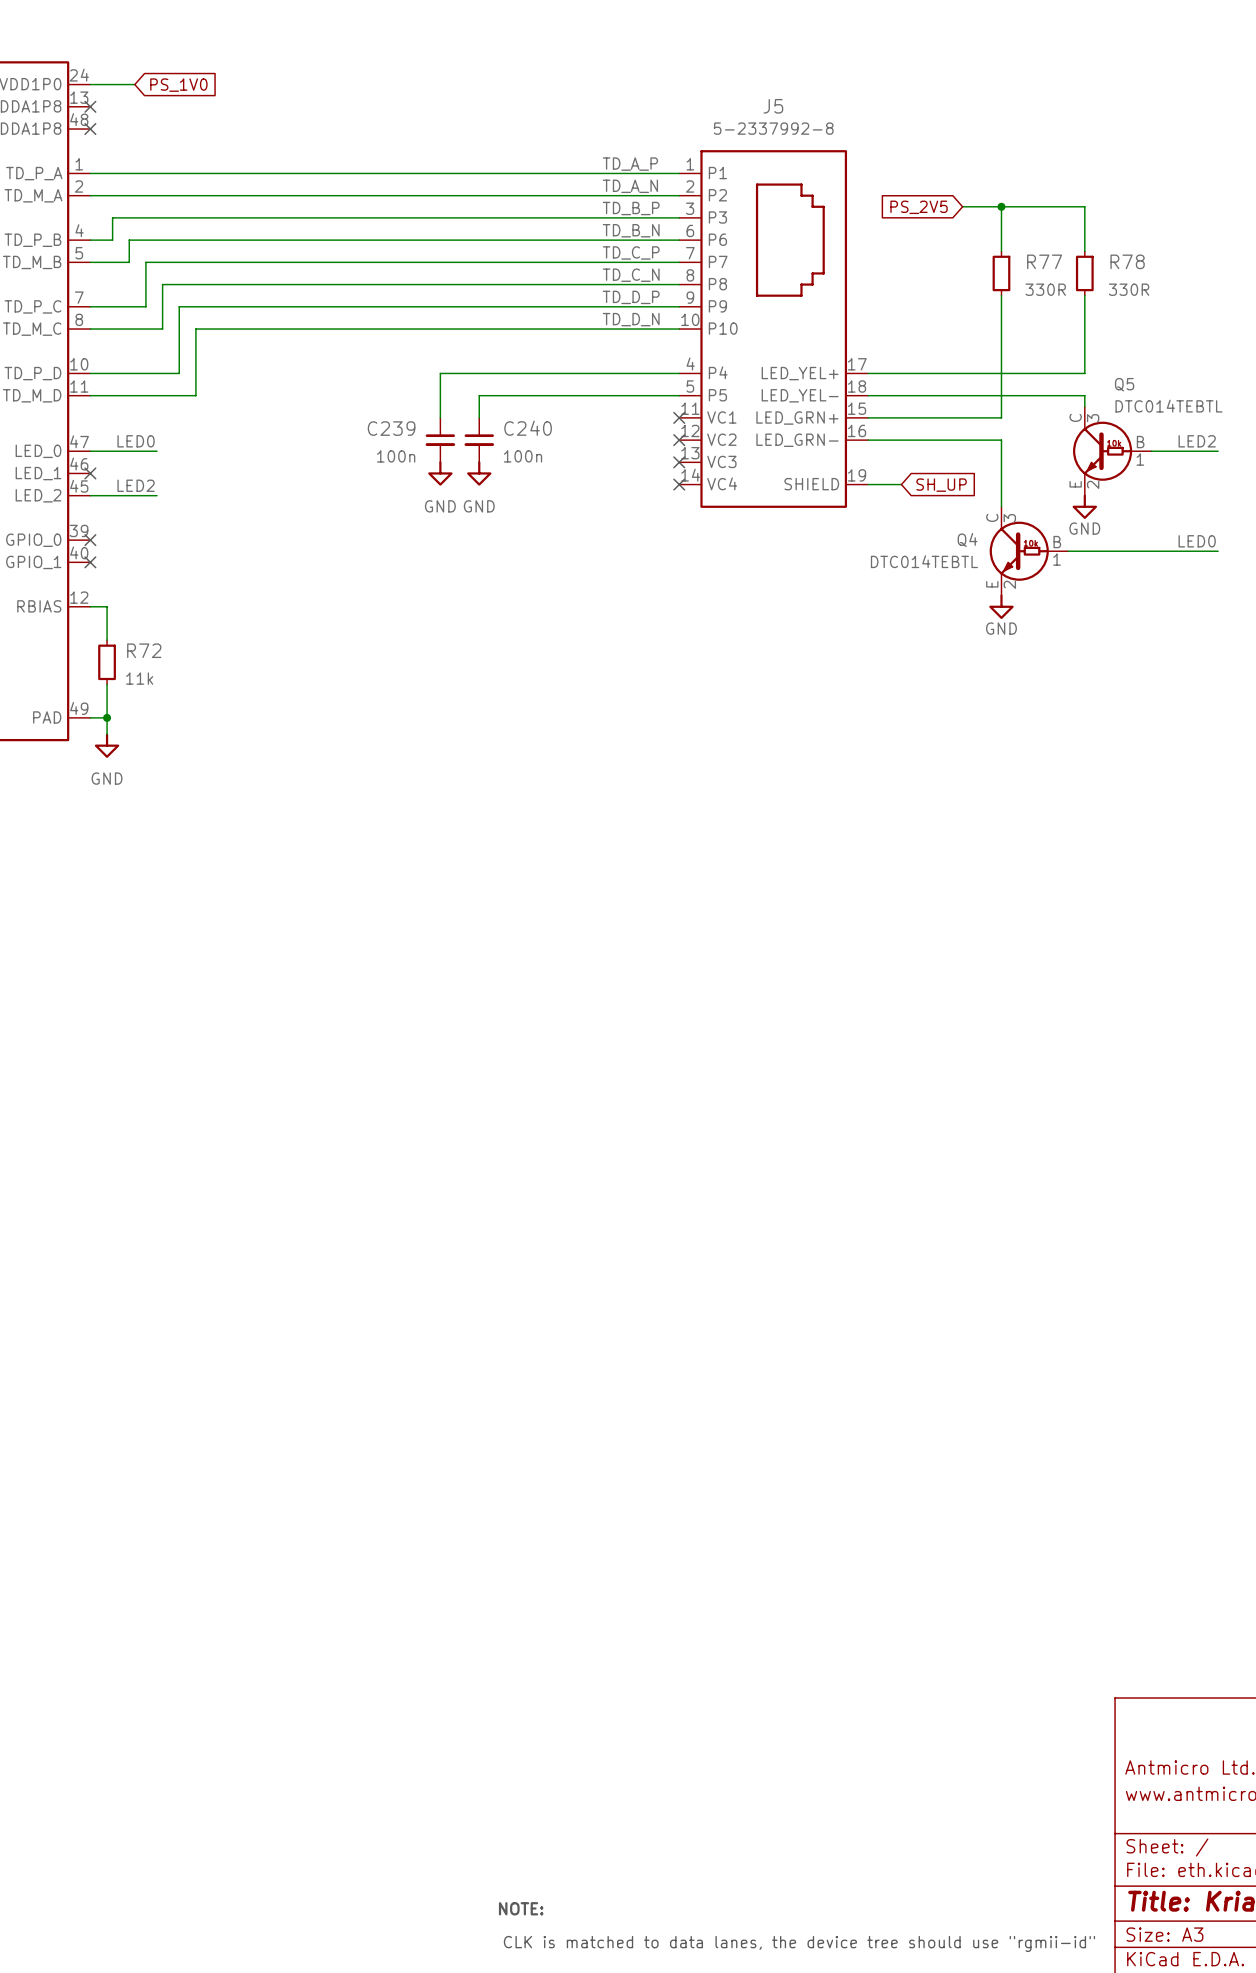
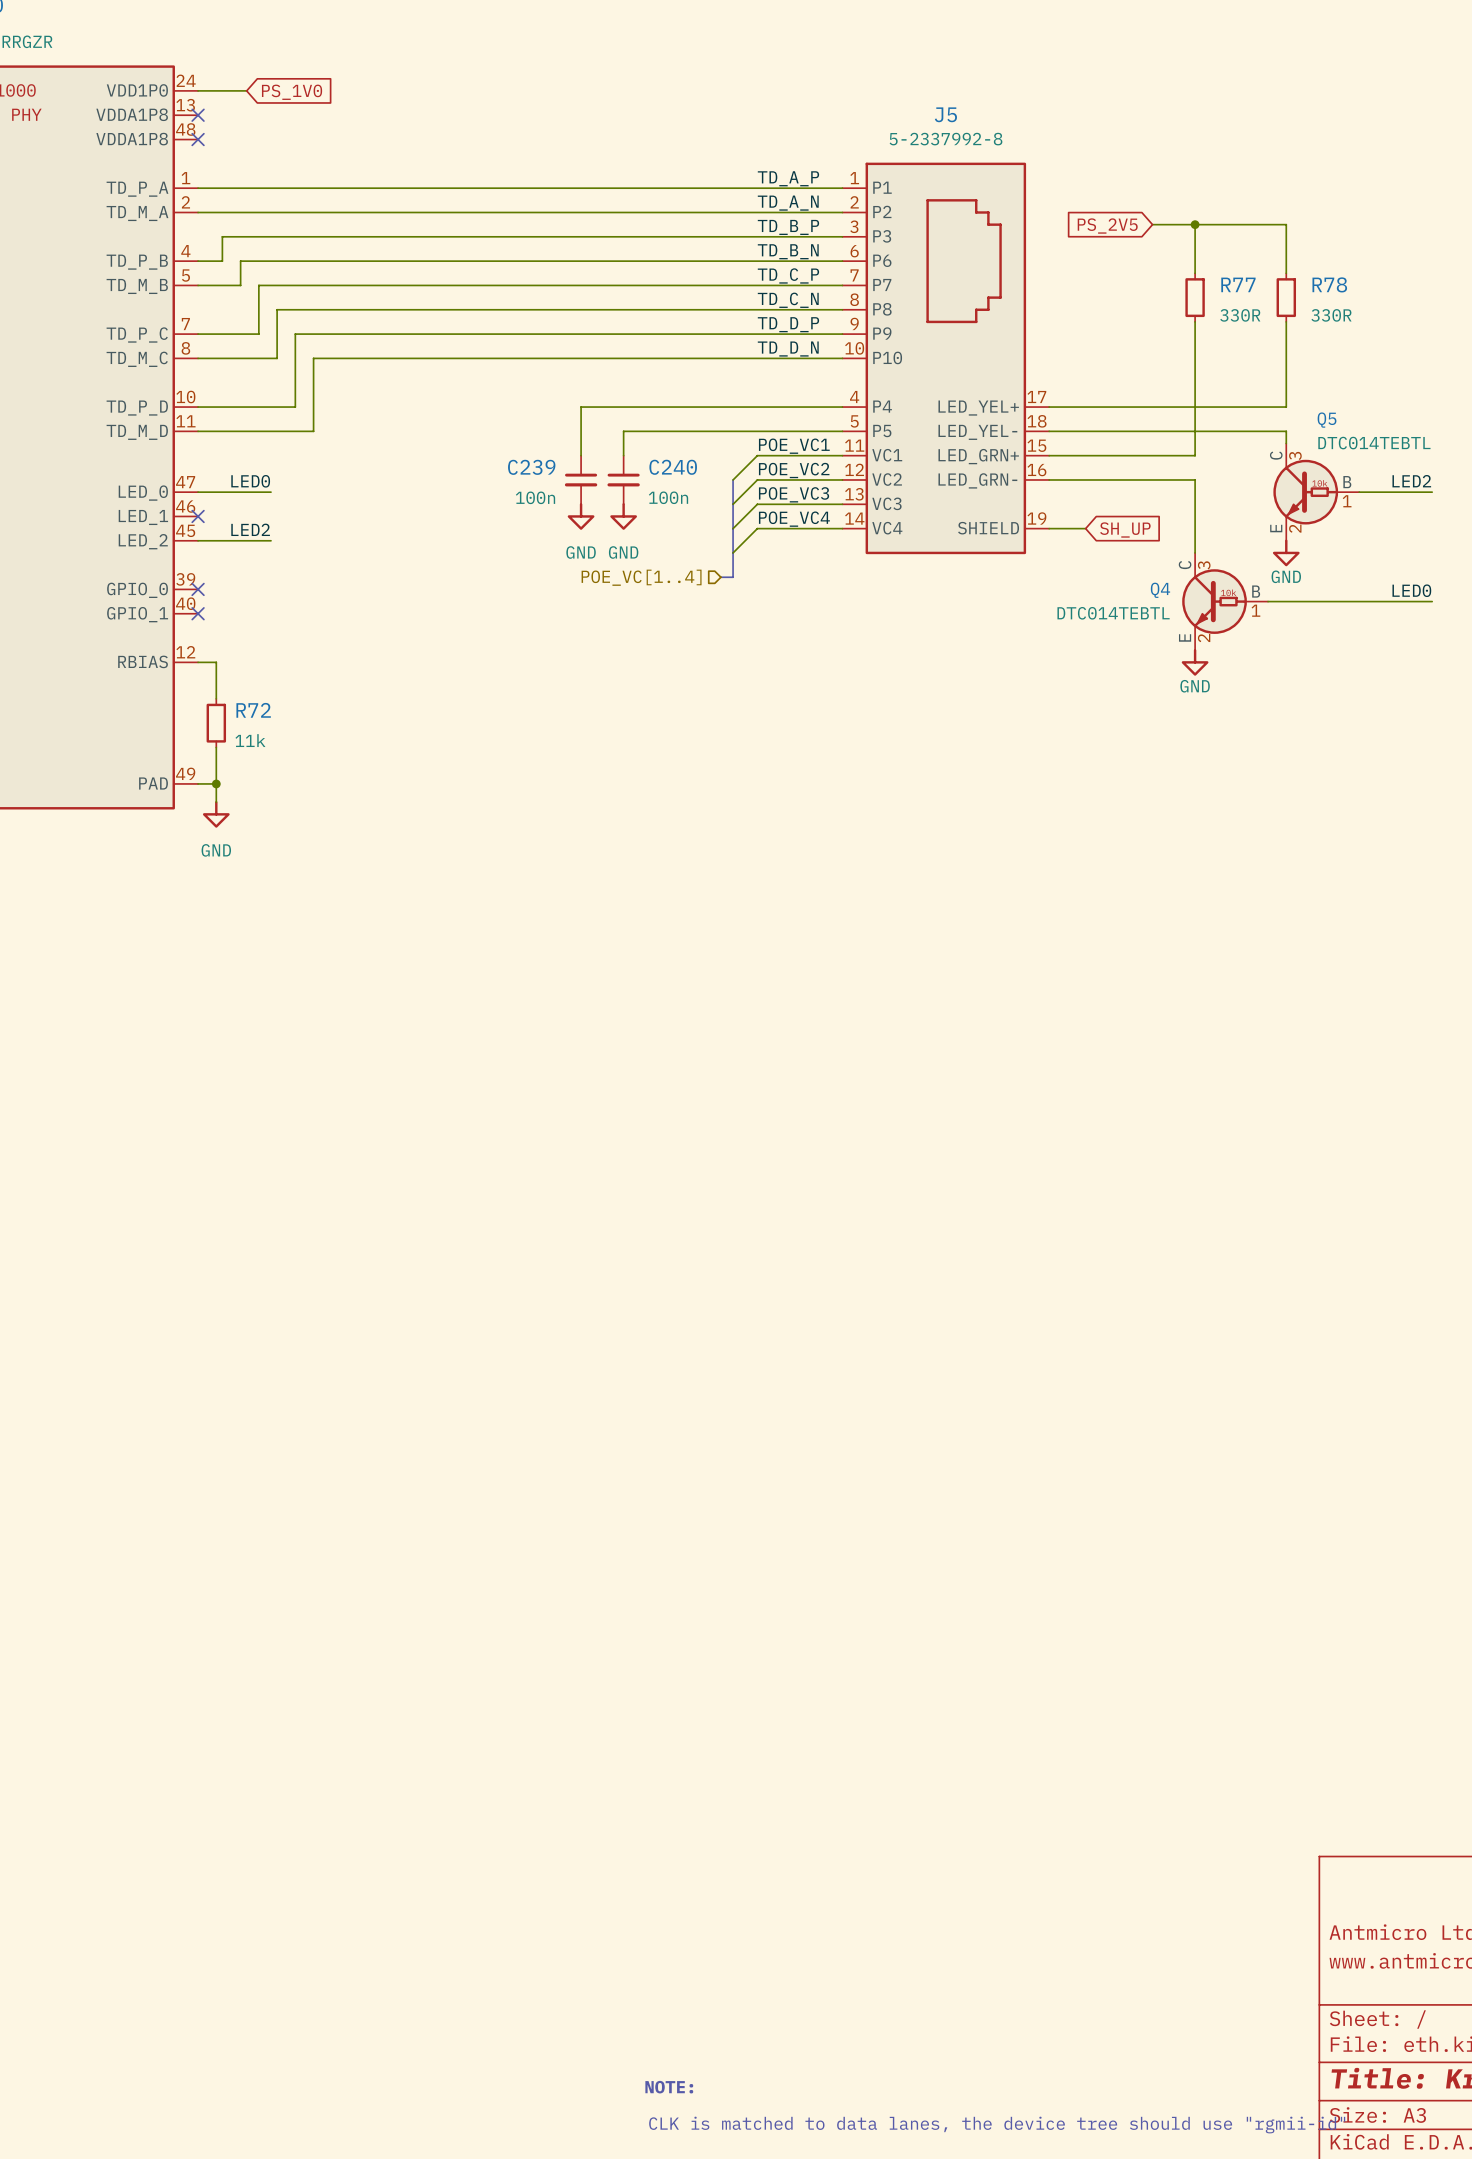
label: none -> POE_VC1 (794, 446)
wire: none -> (842, 455) (757, 455) (733, 479)
no-connect mark: (679, 417) -> none
label: none -> POE_VC2 (794, 470)
bus: none -> (733, 479) (733, 577) (720, 577)
wire: none -> (842, 479) (757, 479) (733, 504)
no-connect mark: (679, 440) -> none
label: none -> POE_VC3 (794, 494)
wire: none -> (842, 504) (757, 504) (733, 528)
no-connect mark: (679, 462) -> none
label: none -> POE_VC4 (794, 519)
wire: none -> (842, 528) (757, 528) (733, 552)
no-connect mark: (679, 484) -> none
hierarchical label: none -> POE_VC[1..4] (641, 577)

